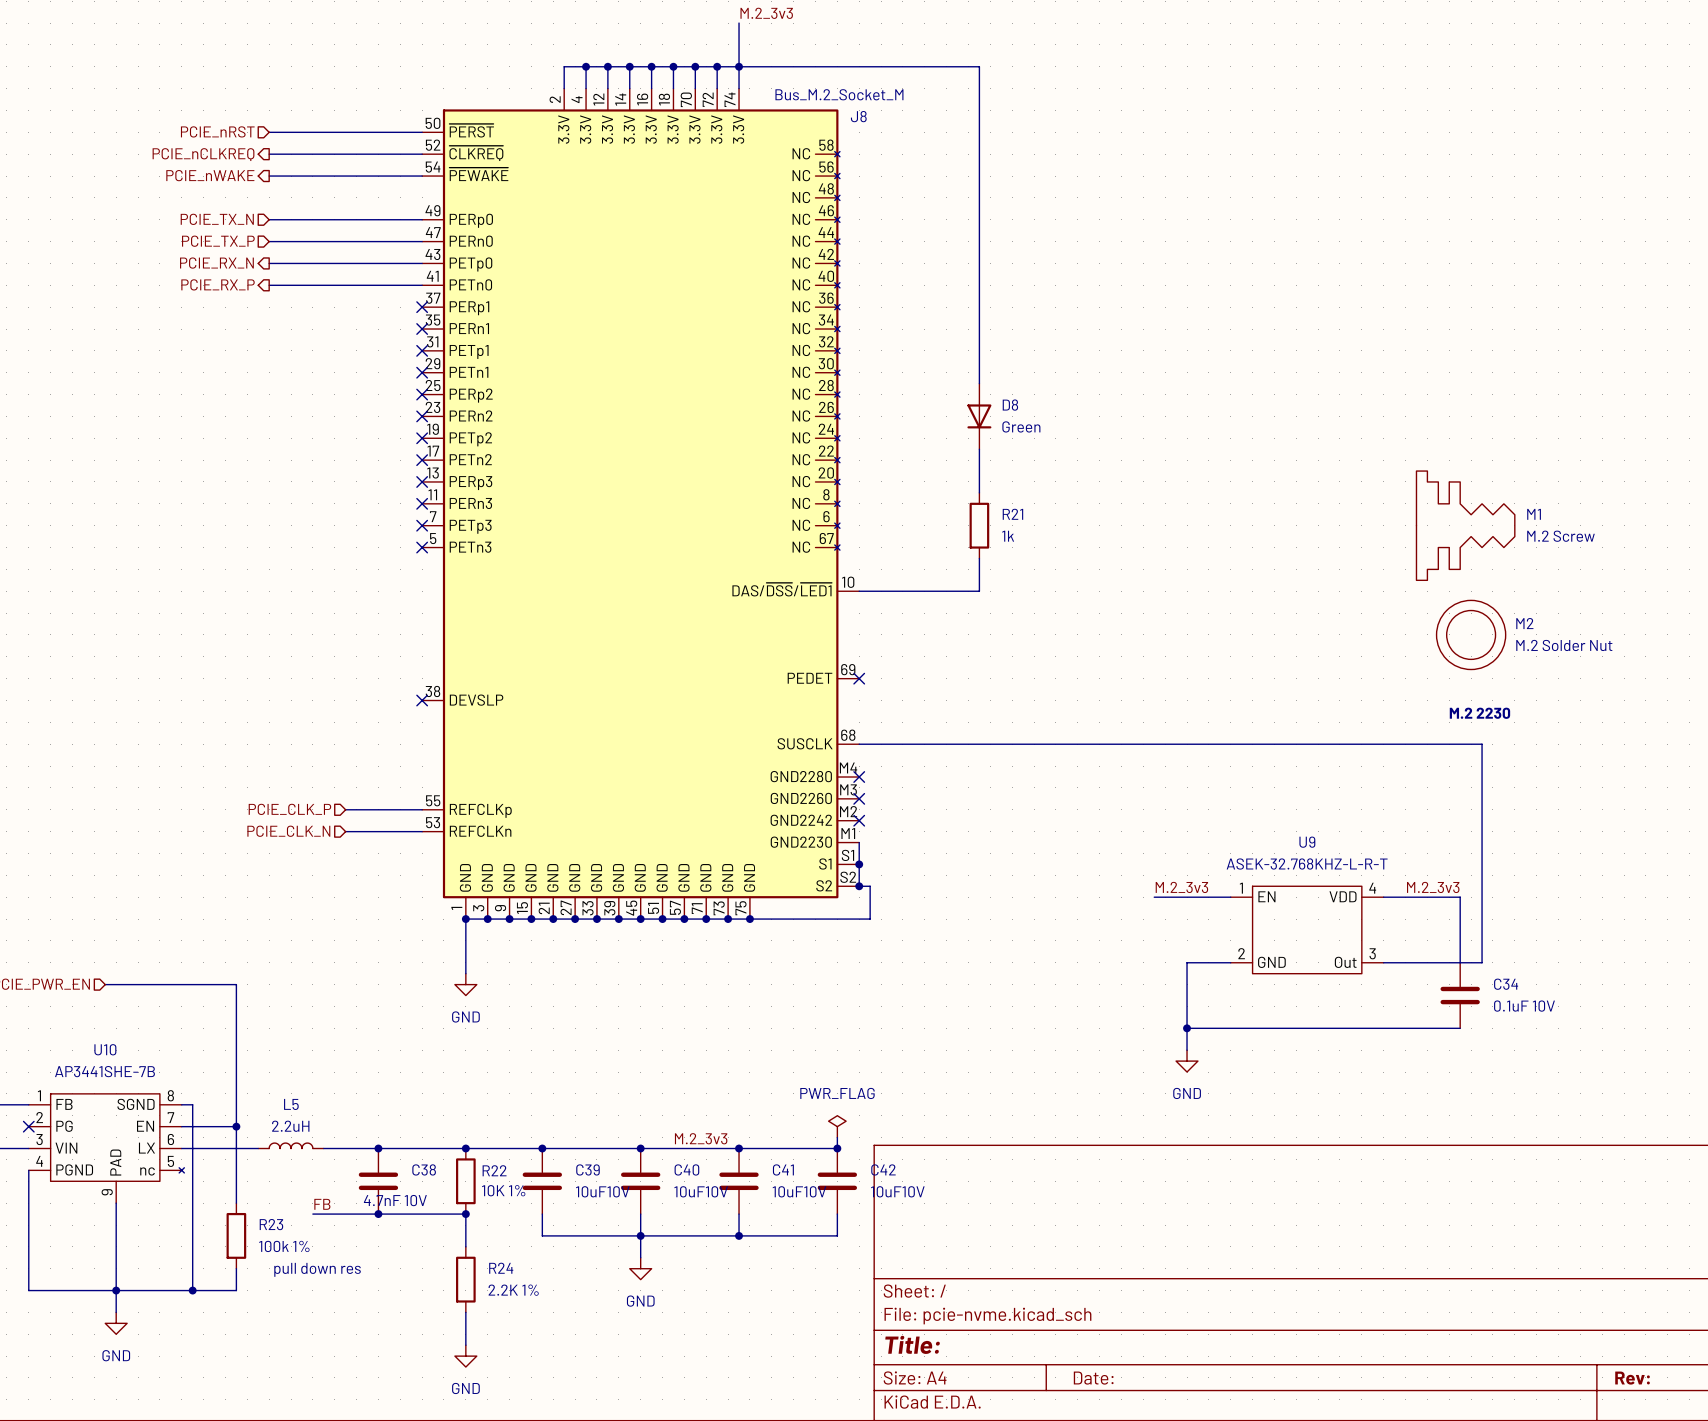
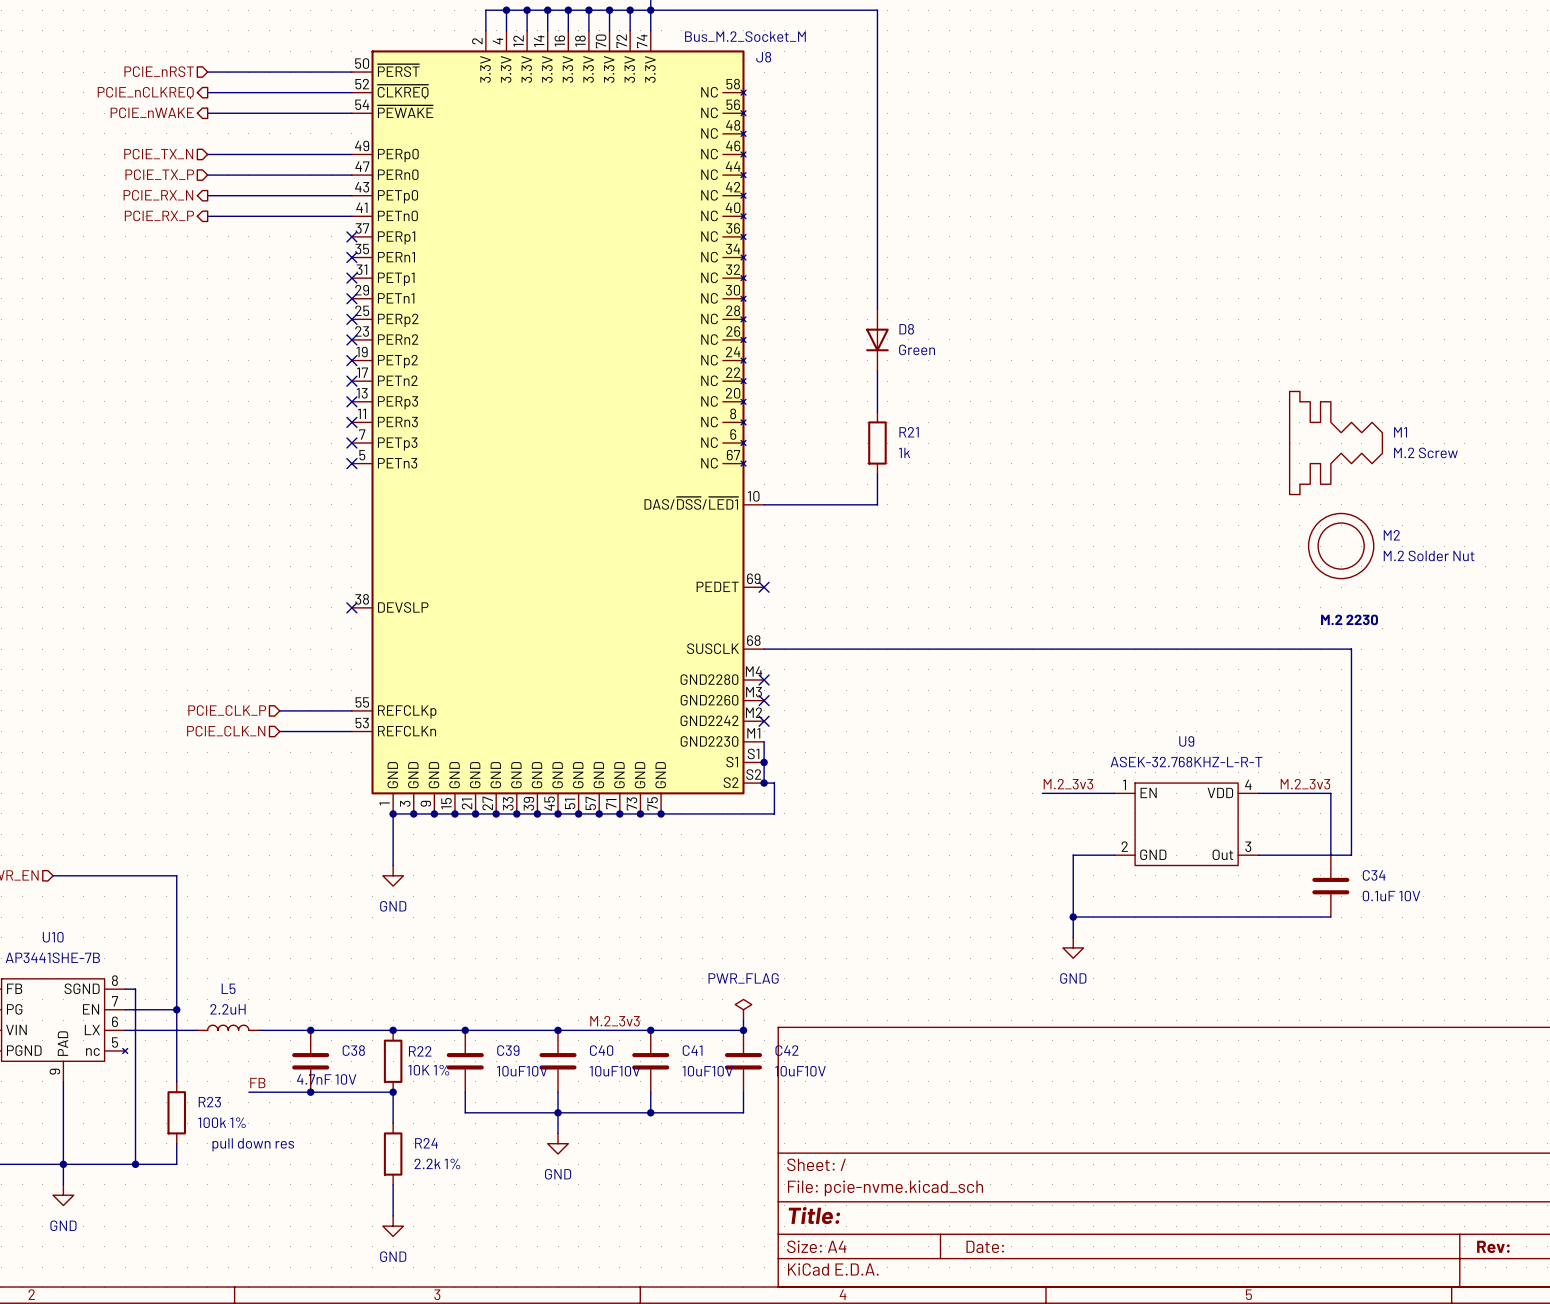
R24 value: 2.2K 1% (513, 1290) -> 2.2k 1% (437, 1163)

